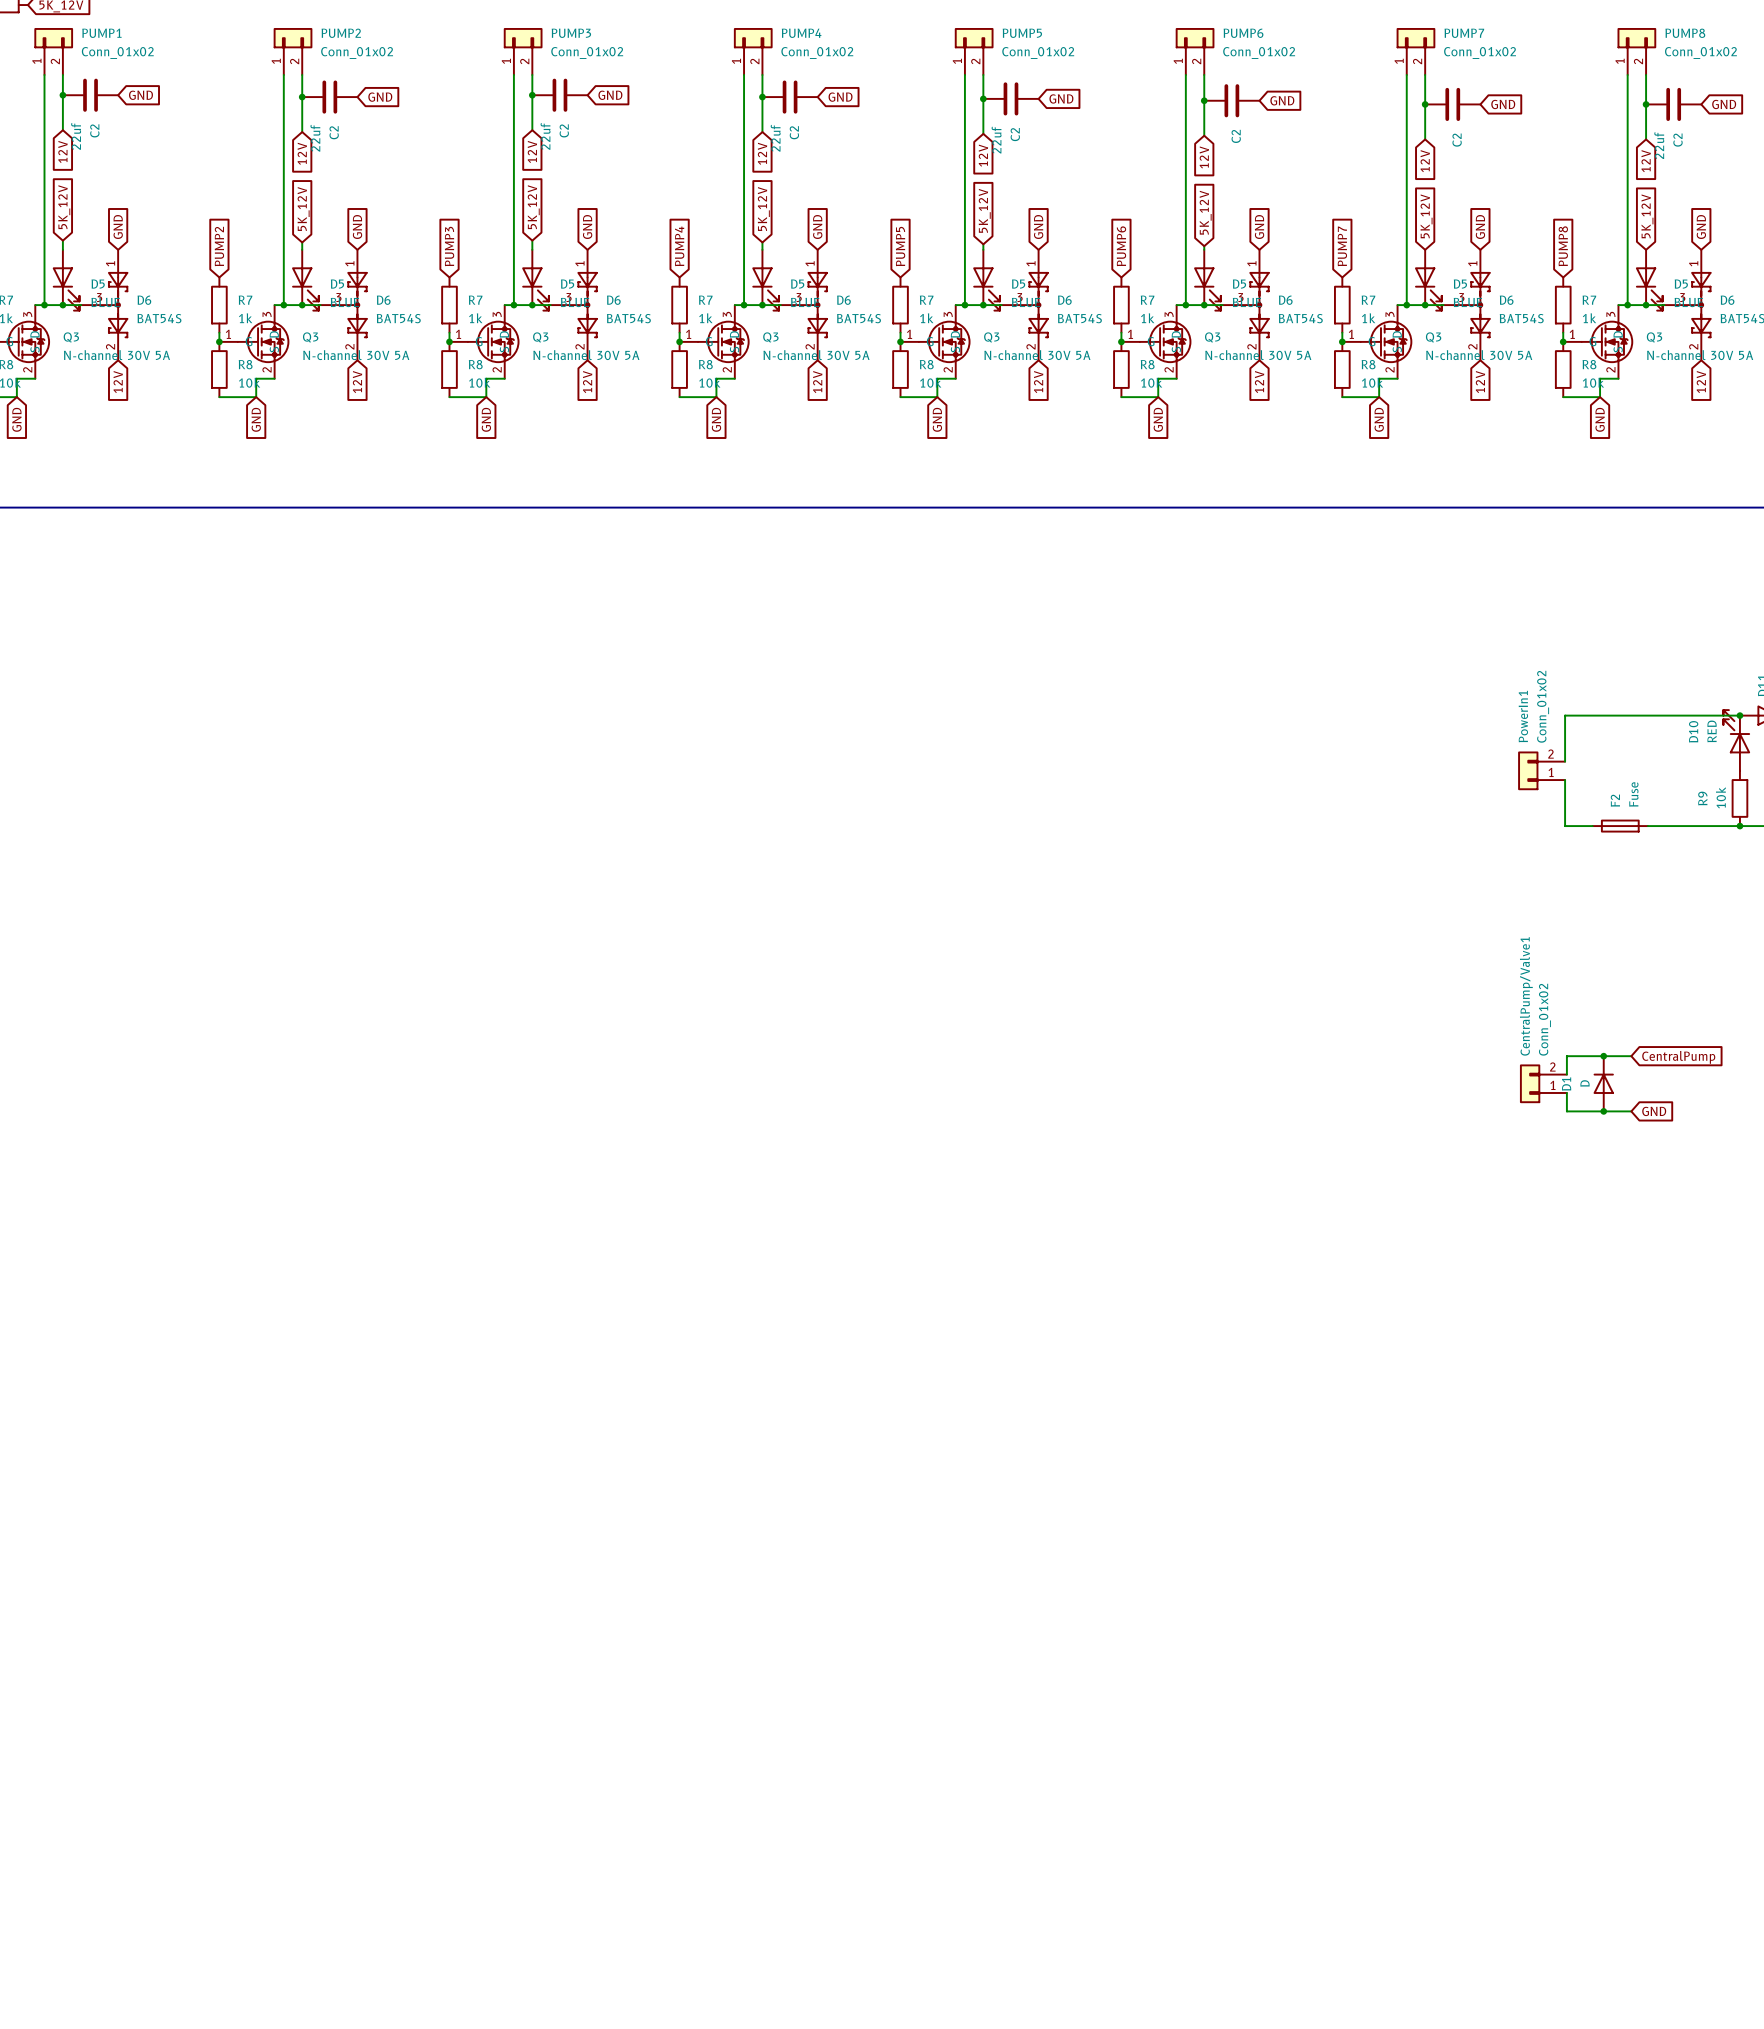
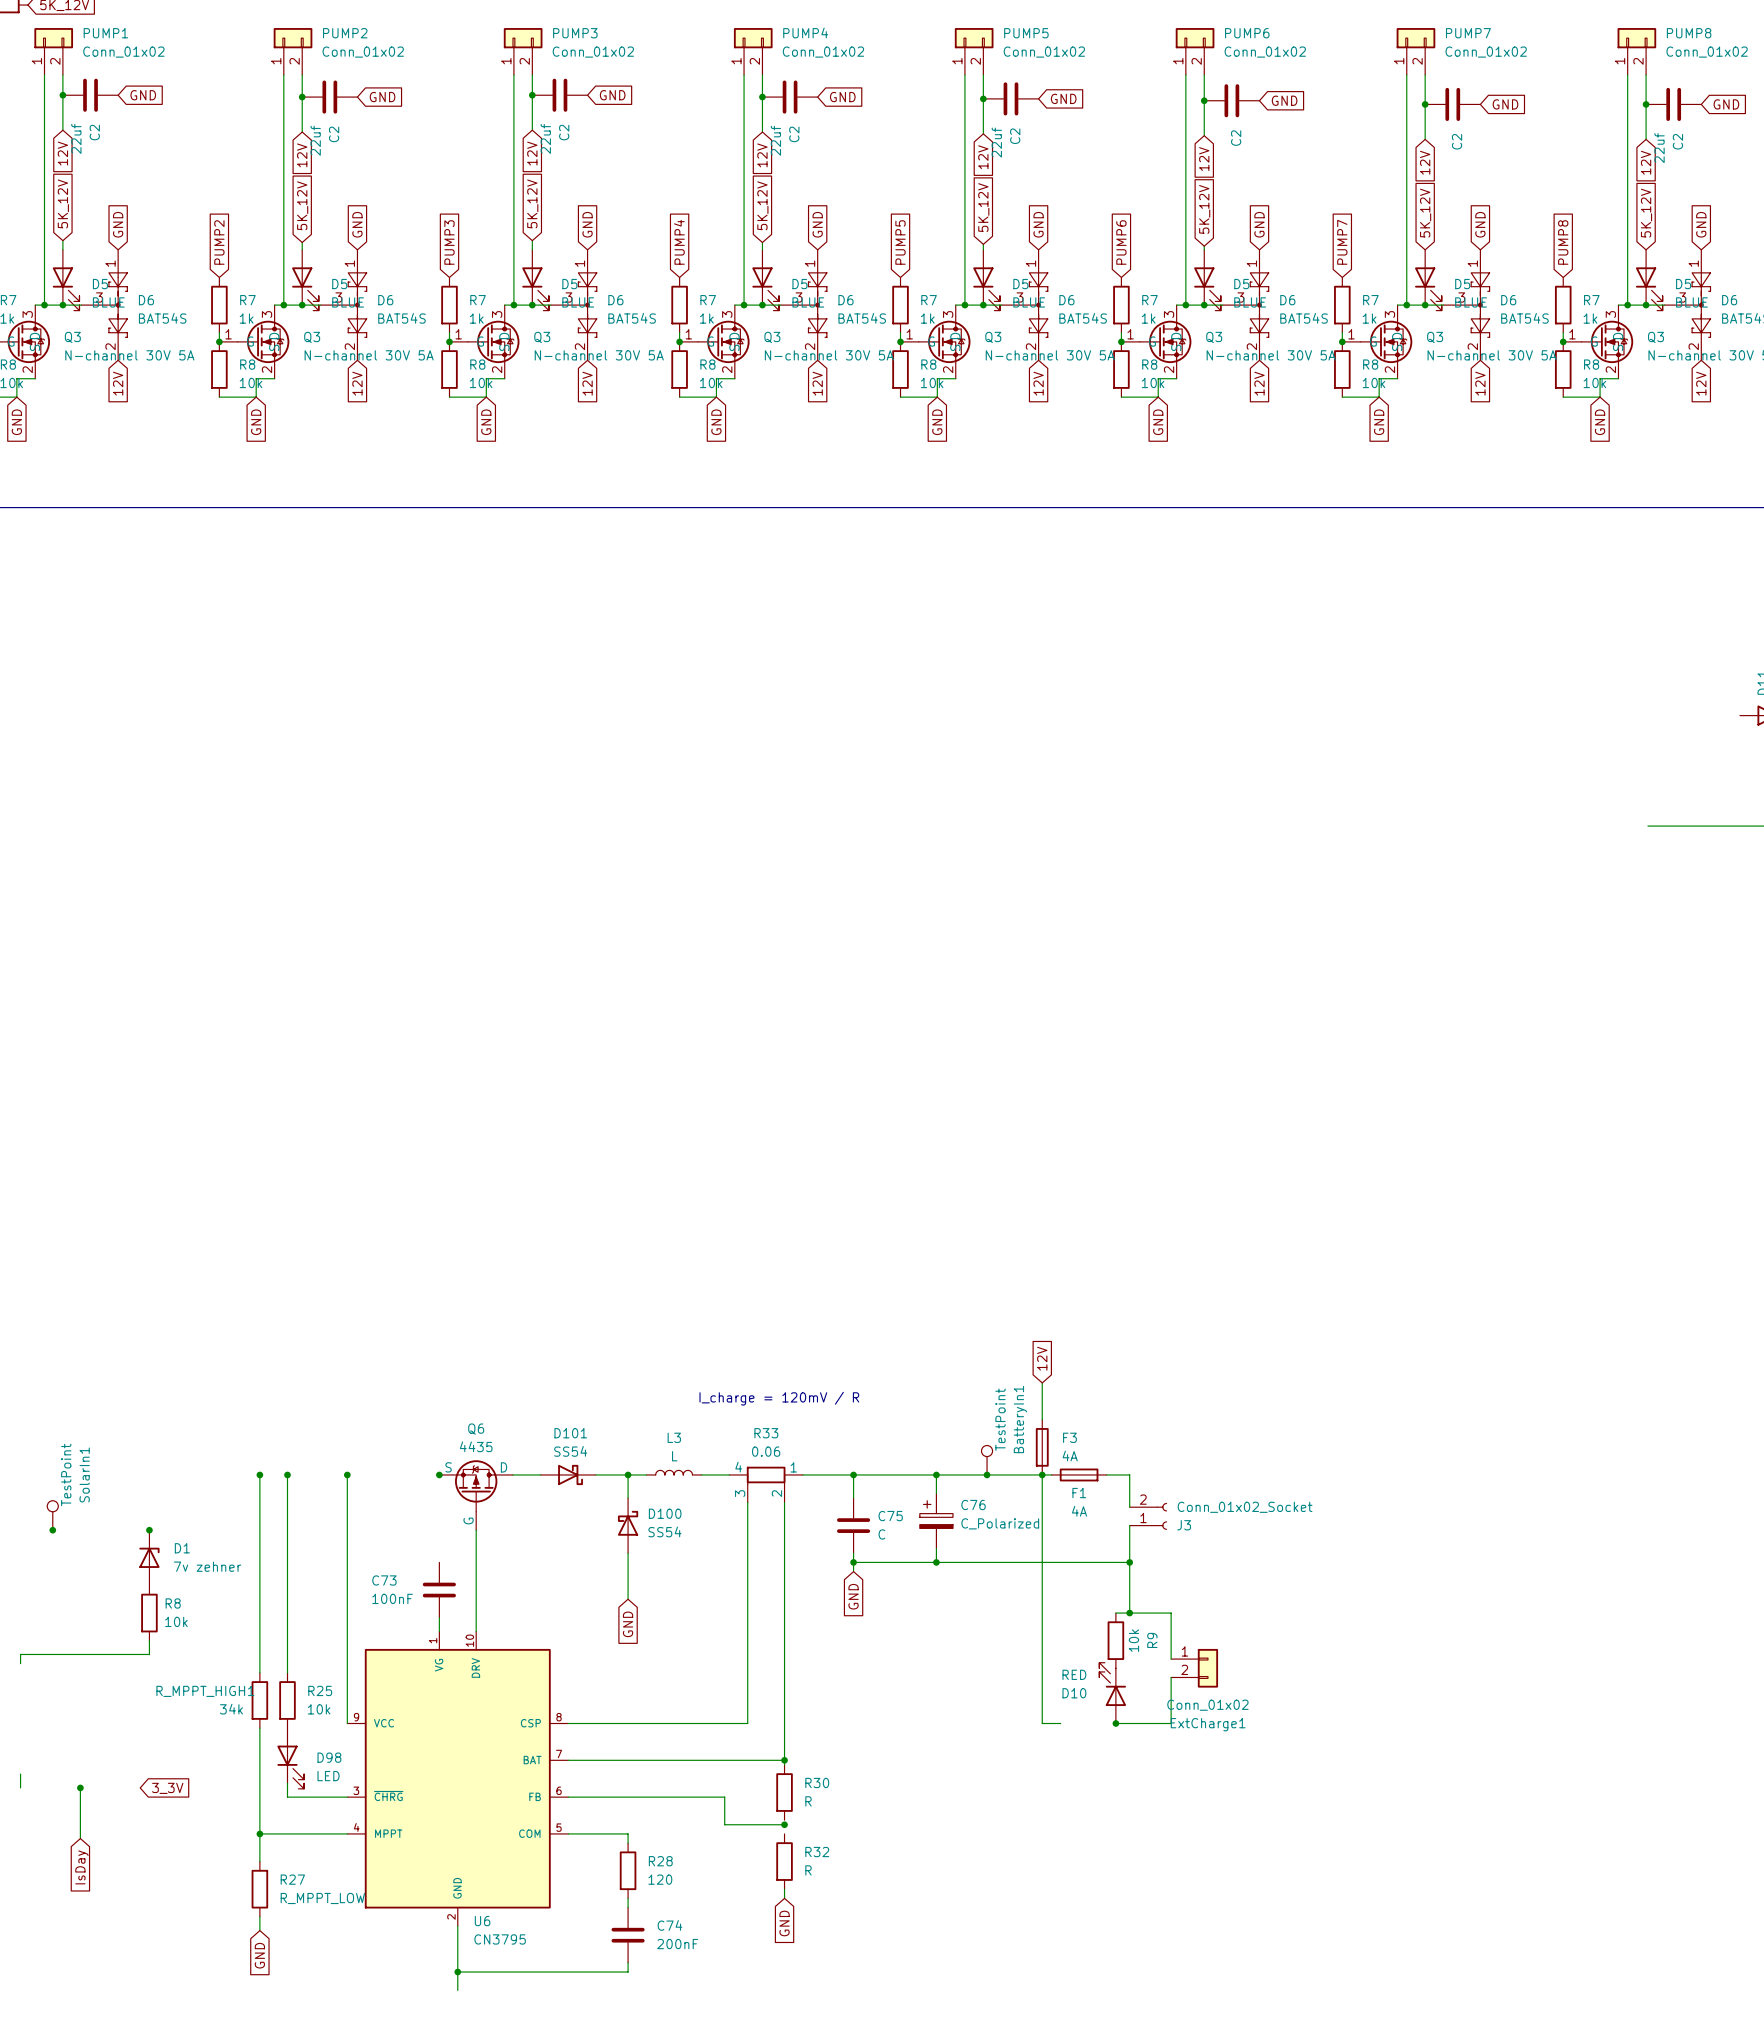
wire: (1739, 715) (1565, 715) (1565, 761) -> none
junction: (1739, 715) -> none
D10 name rotation: 0° (1693, 731) -> 90° clockwise (1074, 1693)
D10 value rotation: 0° (1712, 731) -> 90° clockwise (1074, 1674)
D10 position: (1736, 740) -> (1112, 1693)
PowerIn1: Conn_01x02 (1541, 770) -> none
wire: (1565, 780) (1565, 826) (1592, 826) -> none
R9: 10k (1739, 798) -> none
F2: Fuse (1620, 826) -> none
junction: (1739, 826) -> none
D1 symbol: [1593, 1056, 1614, 1112] -> [139, 1530, 160, 1586]
junction: (1603, 1056) -> none
wire: (1631, 1056) (1566, 1056) (1566, 1074) -> none
global label: CentralPump (1678, 1057) -> none
CentralPump/Valve1: Conn_01x02 (1543, 1083) -> none
D1 value: D (1585, 1083) -> 7v zehner (207, 1566)
D1 name position: D1 (1566, 1084) -> D1 (182, 1548)
wire: (1566, 1092) (1566, 1111) (1631, 1111) -> none
junction: (1603, 1111) -> none
global label: GND (1654, 1111) -> none
global label: none -> 12V (1042, 1358)
wire: none -> (1042, 1382) (1042, 1419)
text: none -> I_charge = 120mV / R (779, 1398)
F3: none -> 4A (1042, 1447)
BatteryIn1: none -> TestPoint (987, 1460)
L3: none -> L (674, 1472)
wire: none -> (259, 1474) (259, 1672)
junction: none -> (259, 1474)
wire: none -> (287, 1474) (287, 1672)
junction: none -> (287, 1474)
wire: none -> (347, 1474) (347, 1723)
junction: none -> (347, 1474)
junction: none -> (439, 1474)
wire: none -> (513, 1474) (540, 1474)
D101: none -> SS54 (568, 1474)
wire: none -> (595, 1474) (646, 1474)
wire: none -> (628, 1474) (628, 1497)
junction: none -> (628, 1474)
wire: none -> (701, 1474) (729, 1474)
wire: none -> (802, 1474) (1051, 1474)
wire: none -> (853, 1474) (853, 1497)
junction: none -> (853, 1474)
wire: none -> (936, 1474) (936, 1493)
junction: none -> (936, 1474)
junction: none -> (987, 1474)
wire: none -> (1042, 1474) (1042, 1723) (1060, 1723)
junction: none -> (1042, 1474)
F1: none -> 4A (1079, 1474)
wire: none -> (1106, 1474) (1129, 1474) (1129, 1507)
R33: none -> 0.06 (766, 1484)
Q6: none -> 4435 (476, 1495)
wire: none -> (747, 1502) (747, 1723) (568, 1723)
wire: none -> (784, 1502) (784, 1764)
SolarIn1: none -> TestPoint (52, 1515)
J3: none -> Conn_01x02_Socket (1148, 1516)
C76: none -> C_Polarized (936, 1521)
D100: none -> SS54 (628, 1525)
C75: none -> C (853, 1525)
wire: none -> (1129, 1525) (1129, 1613)
junction: none -> (52, 1530)
junction: none -> (149, 1530)
wire: none -> (476, 1530) (476, 1631)
wire: none -> (936, 1548) (936, 1562)
wire: none -> (628, 1553) (628, 1599)
wire: none -> (853, 1553) (853, 1571)
wire: none -> (853, 1562) (1129, 1562)
junction: none -> (853, 1562)
junction: none -> (936, 1562)
junction: none -> (1129, 1562)
C73: none -> 100nF (439, 1590)
global label: none -> GND (853, 1596)
R8: none -> 10k (149, 1613)
wire: none -> (1115, 1613) (1171, 1613) (1171, 1659)
junction: none -> (1129, 1613)
wire: none -> (439, 1617) (439, 1631)
global label: none -> GND (628, 1624)
wire: none -> (149, 1640) (149, 1654) (20, 1654) (20, 1663)
R9: none -> 10k (1115, 1640)
ExtCharge1: none -> Conn_01x02 (1194, 1668)
wire: none -> (1171, 1677) (1171, 1723) (1115, 1723)
R_MPPT_HIGH1: none -> 34k (259, 1700)
R25: none -> 10k (287, 1700)
junction: none -> (1115, 1723)
wire: none -> (259, 1728) (259, 1861)
D98: none -> LED (290, 1758)
wire: none -> (568, 1760) (784, 1760)
junction: none -> (784, 1760)
wire: none -> (20, 1774) (20, 1787)
U6: none -> CN3795 (457, 1778)
wire: none -> (287, 1783) (287, 1797) (347, 1797)
wire: none -> (80, 1787) (80, 1838)
junction: none -> (80, 1787)
global label: none -> 3_3V (167, 1788)
R30: none -> R (784, 1792)
wire: none -> (568, 1797) (724, 1797) (724, 1824) (784, 1824)
junction: none -> (784, 1824)
wire: none -> (259, 1833) (347, 1833)
junction: none -> (259, 1833)
wire: none -> (568, 1833) (628, 1833) (628, 1843)
R32: none -> R (784, 1861)
global label: none -> IsDay (81, 1867)
R28: none -> 120 (628, 1870)
R27: none -> R_MPPT_LOW (259, 1889)
wire: none -> (784, 1889) (784, 1898)
wire: none -> (628, 1898) (628, 1907)
wire: none -> (259, 1916) (259, 1930)
global label: none -> GND (784, 1923)
wire: none -> (457, 1926) (457, 1990)
C74: none -> 200nF (628, 1935)
global label: none -> GND (259, 1955)
wire: none -> (628, 1962) (628, 1972) (457, 1972)
junction: none -> (457, 1972)

